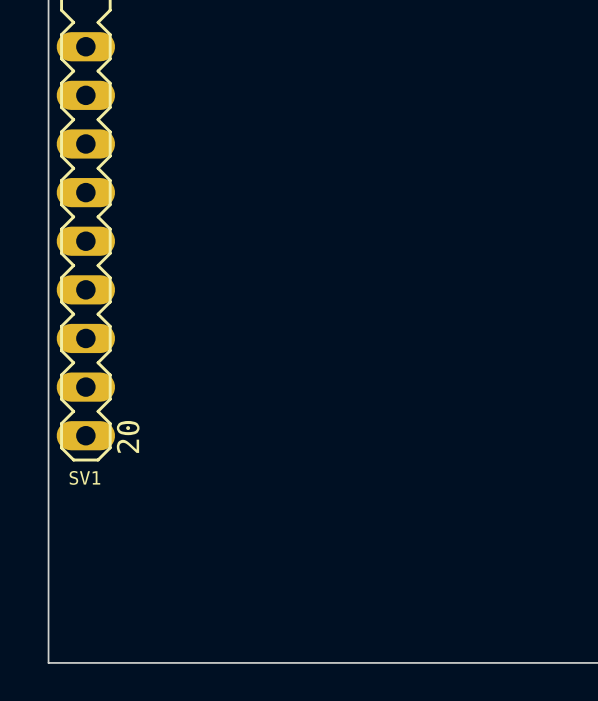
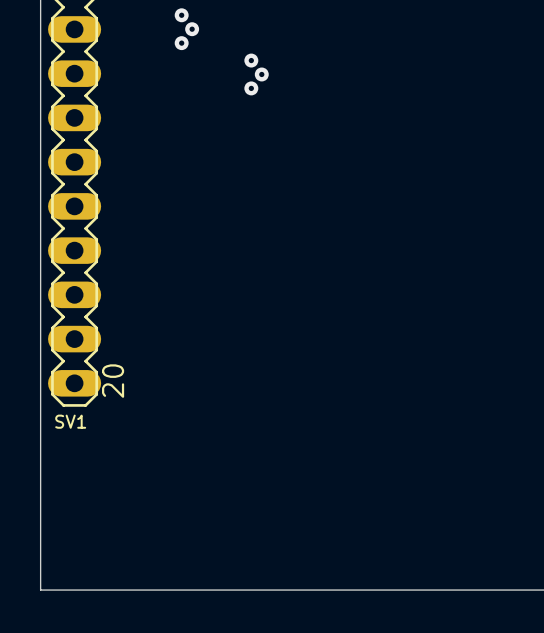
via: none -> (181, 15)
via: none -> (192, 29)
via: none -> (181, 43)
via: none -> (251, 60)
via: none -> (261, 74)
via: none -> (251, 88)

